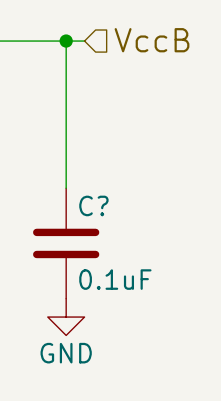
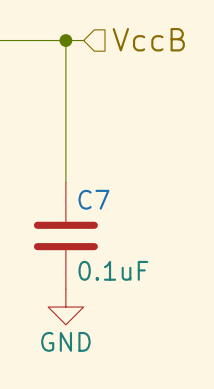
C? name: C? (93, 205) -> C7 (93, 199)

